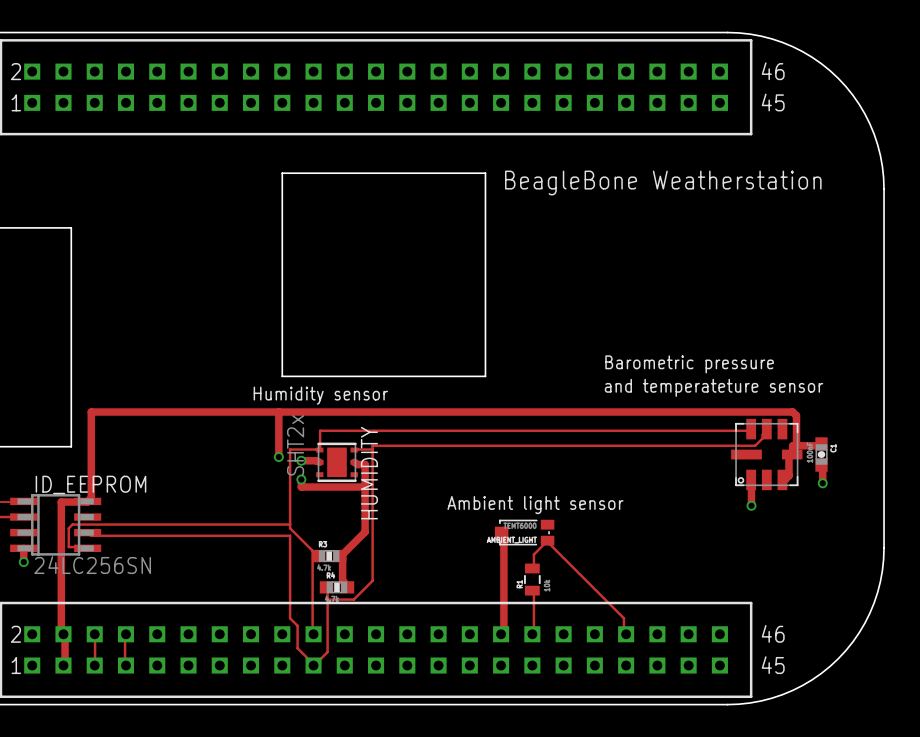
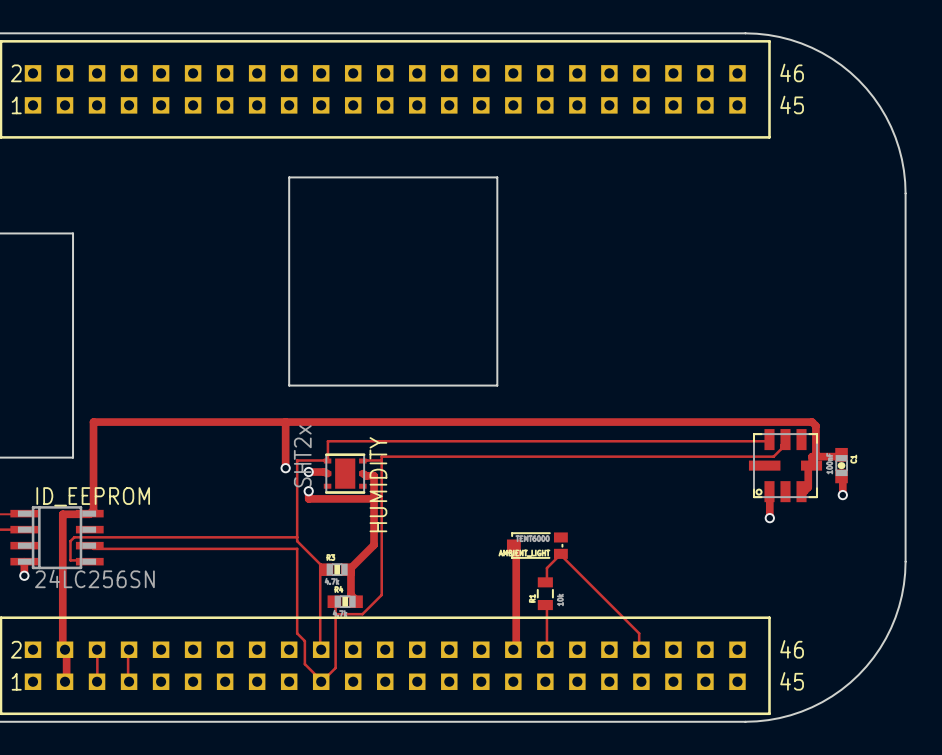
text: BeagleBone Weatherstation (663, 182) -> none
text: Barometric pressure (689, 364) -> none
text: and temperateture sensor (714, 387) -> none
text: Humidity sensor (320, 395) -> none
text: Ambient light sensor (535, 505) -> none

